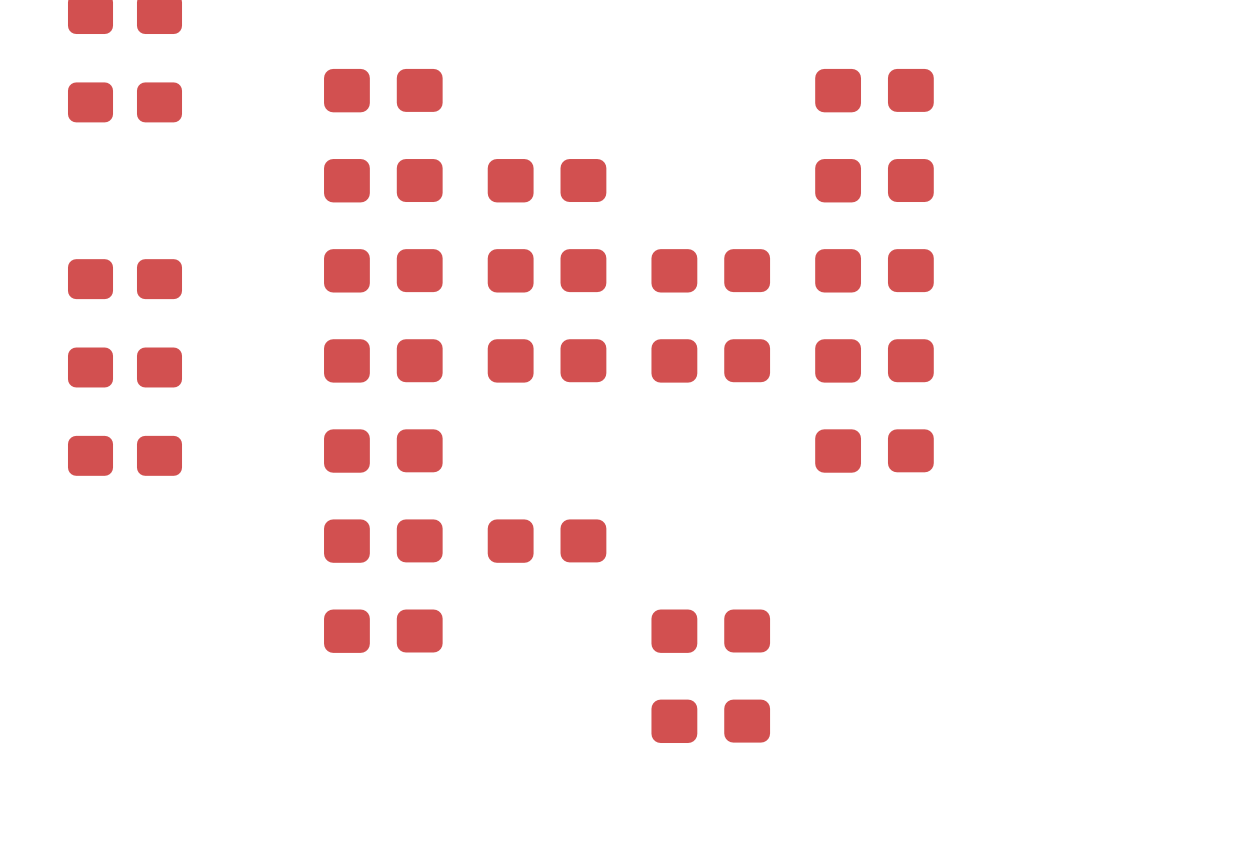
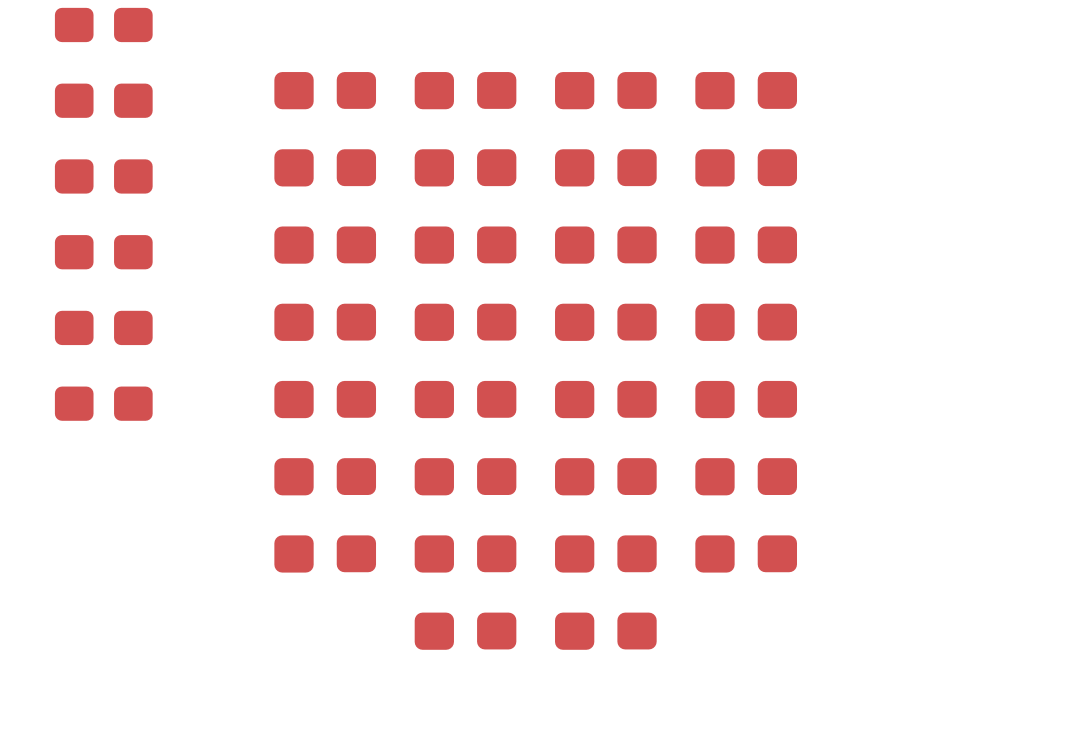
part: none -> (465, 90)
part: none -> (605, 90)
part: none -> (605, 167)
part: none -> (103, 176)
part: none -> (465, 399)
part: none -> (605, 399)
part: none -> (605, 476)
part: none -> (746, 476)
part: none -> (465, 553)
part: none -> (746, 553)
part: none -> (465, 631)

